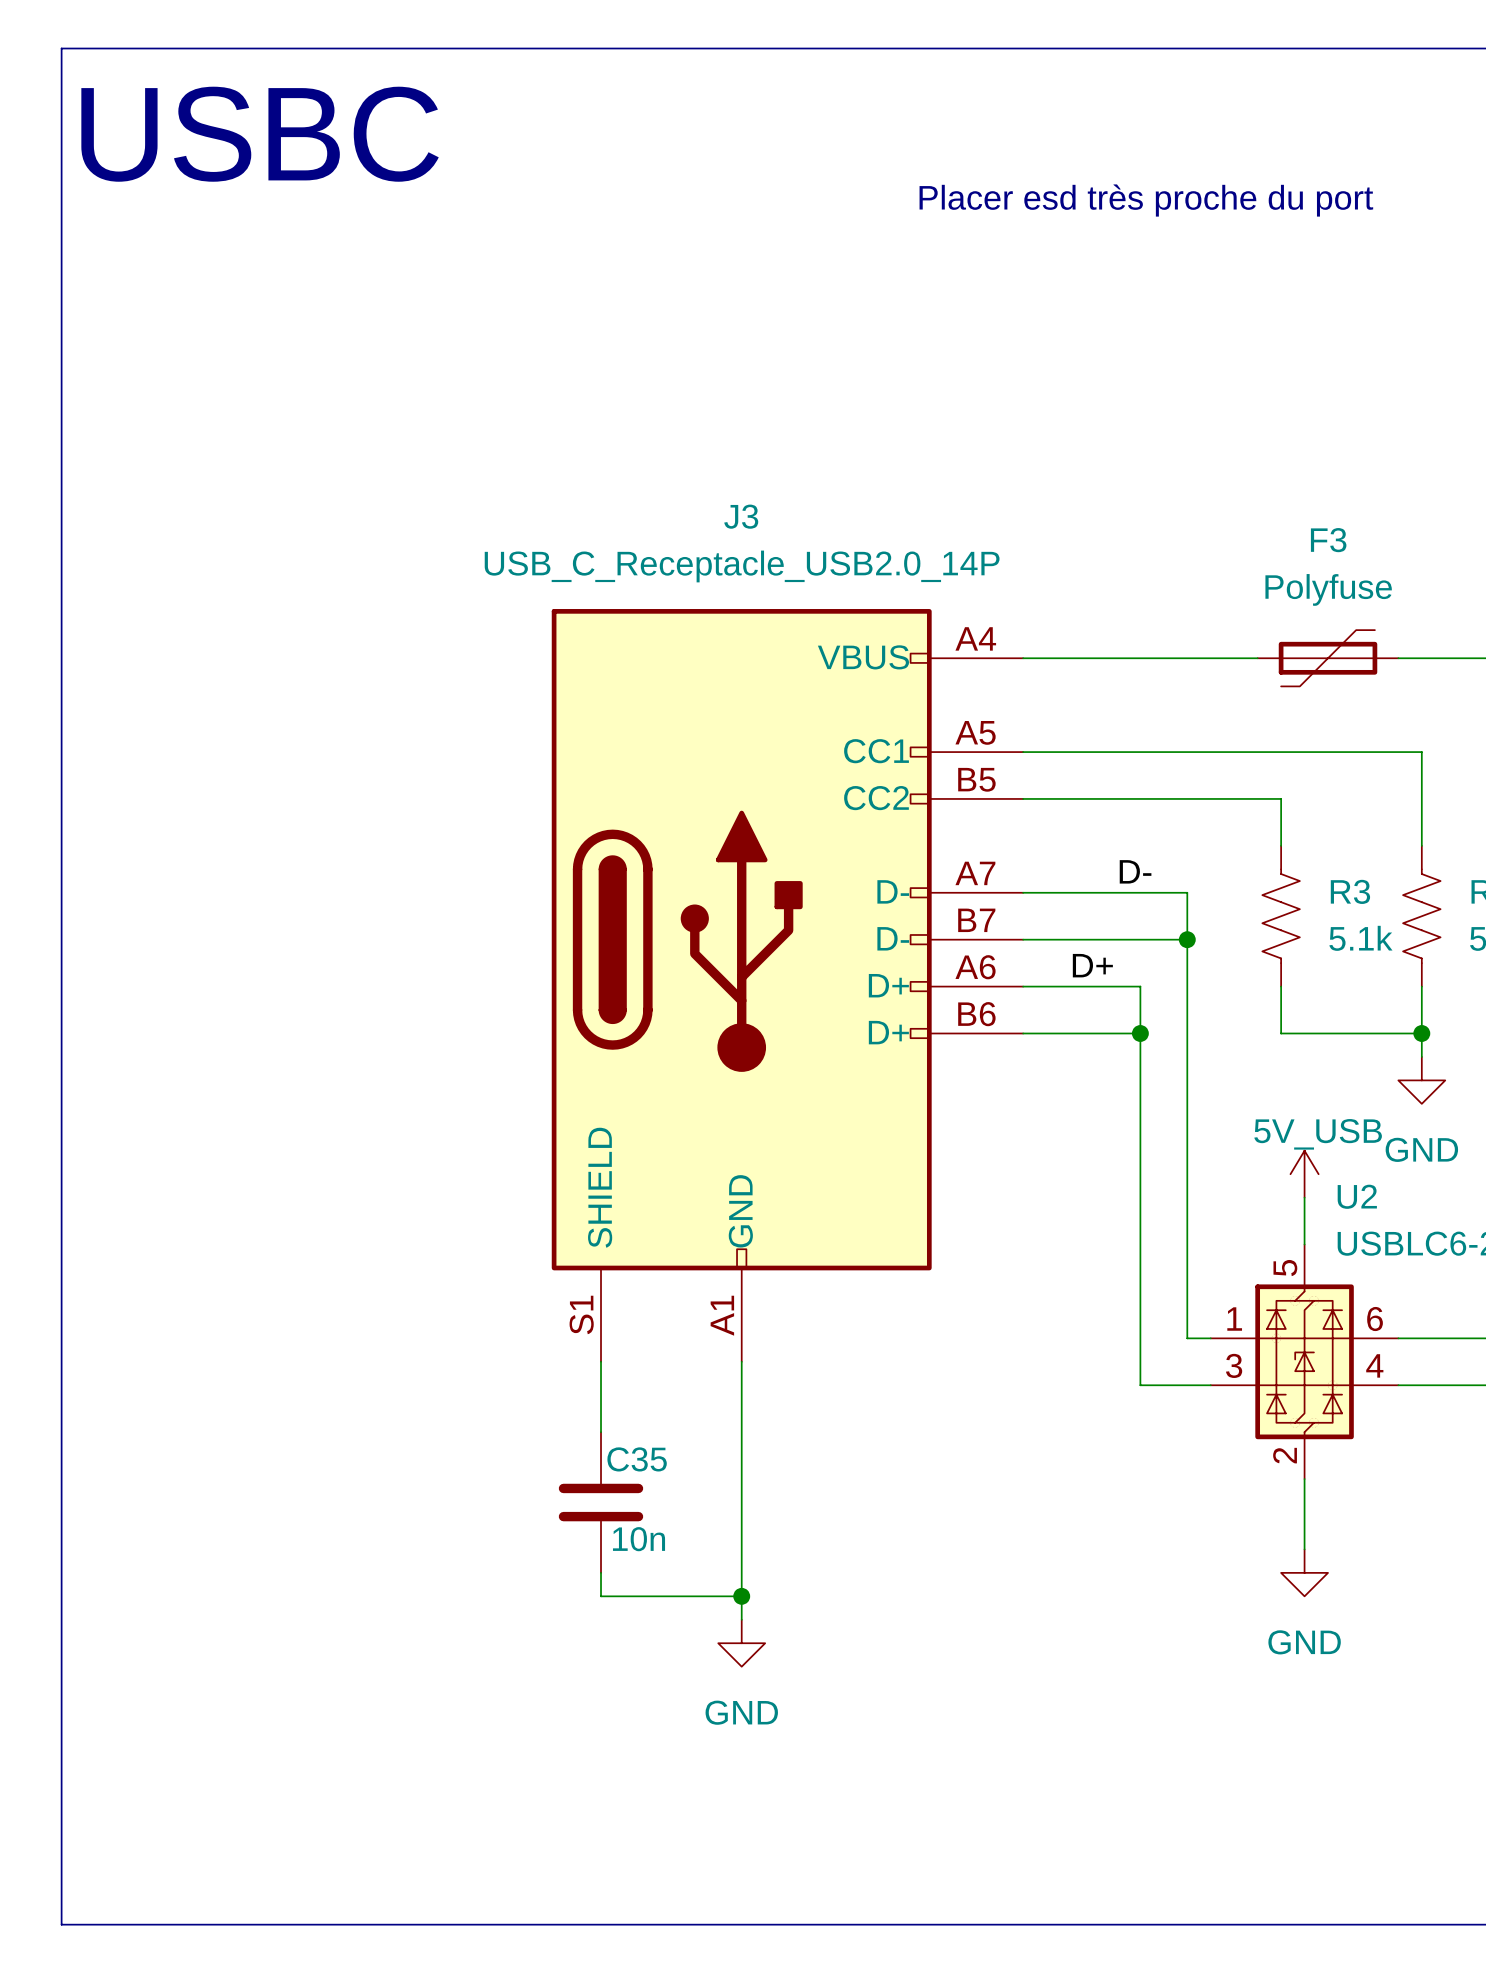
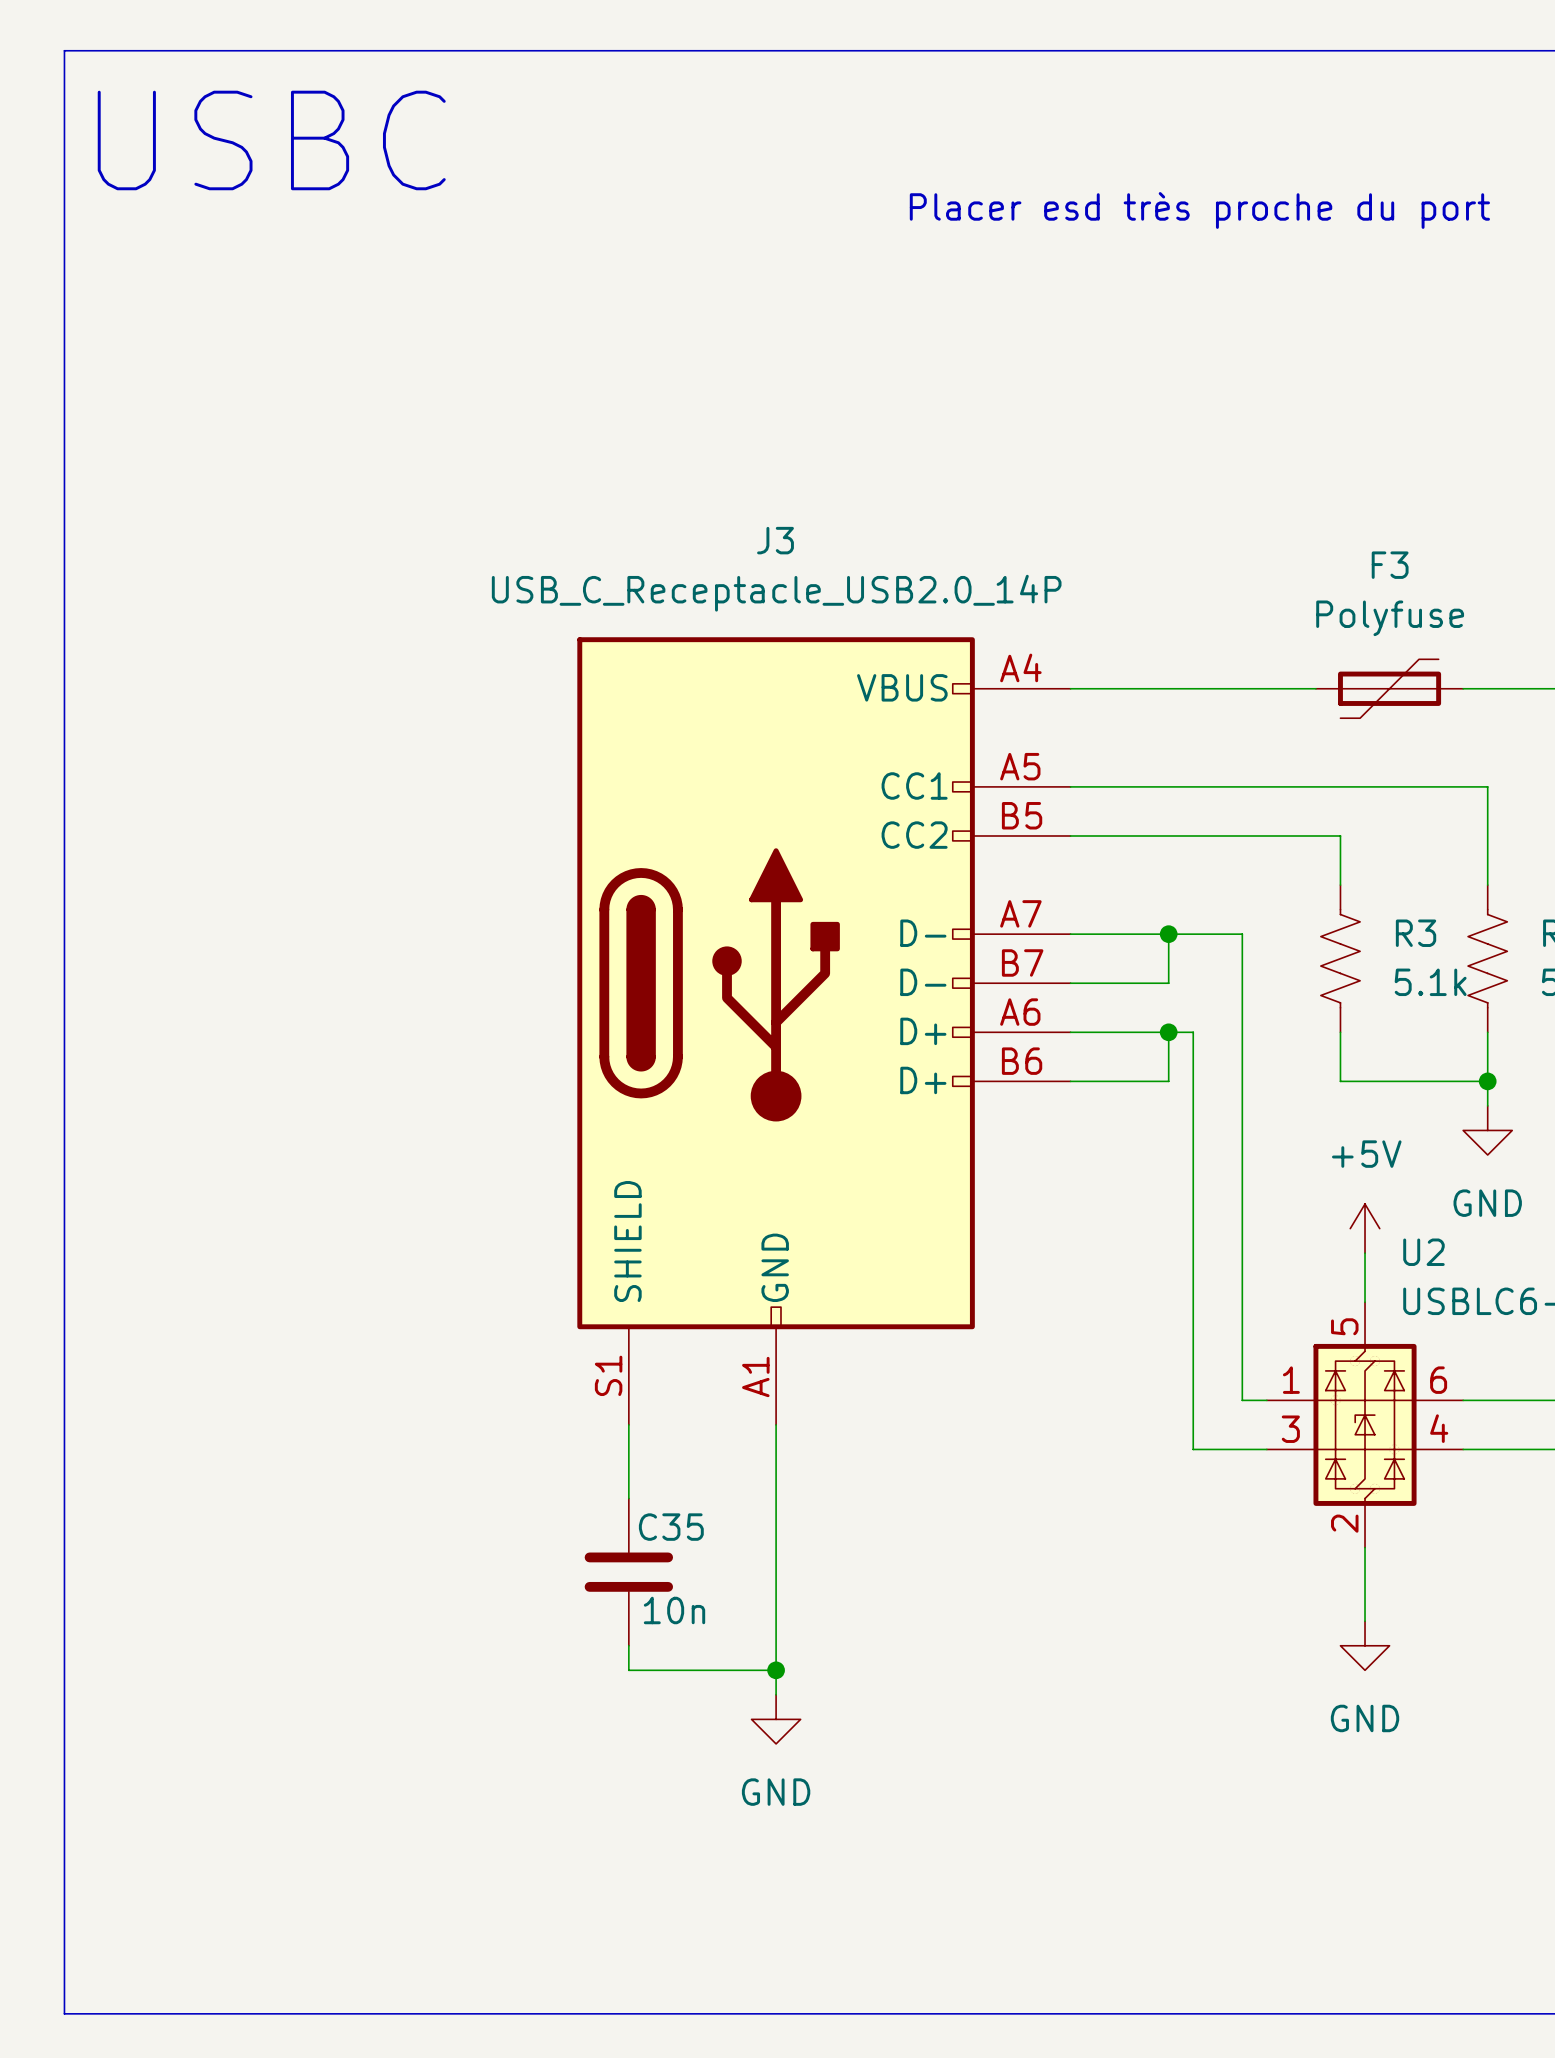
label: D- (1135, 871) -> none
junction: none -> (1168, 934)
wire: (1116, 939) (1187, 939) -> (1168, 983) (1168, 934)
junction: (1187, 939) -> none
label: D+ (1092, 965) -> none
junction: none -> (1168, 1032)
wire: (1116, 1033) (1140, 1033) -> (1168, 1081) (1168, 1032)
junction: (1140, 1033) -> none
power symbol: 5V_USB (1304, 1174) -> +5V (1365, 1228)

